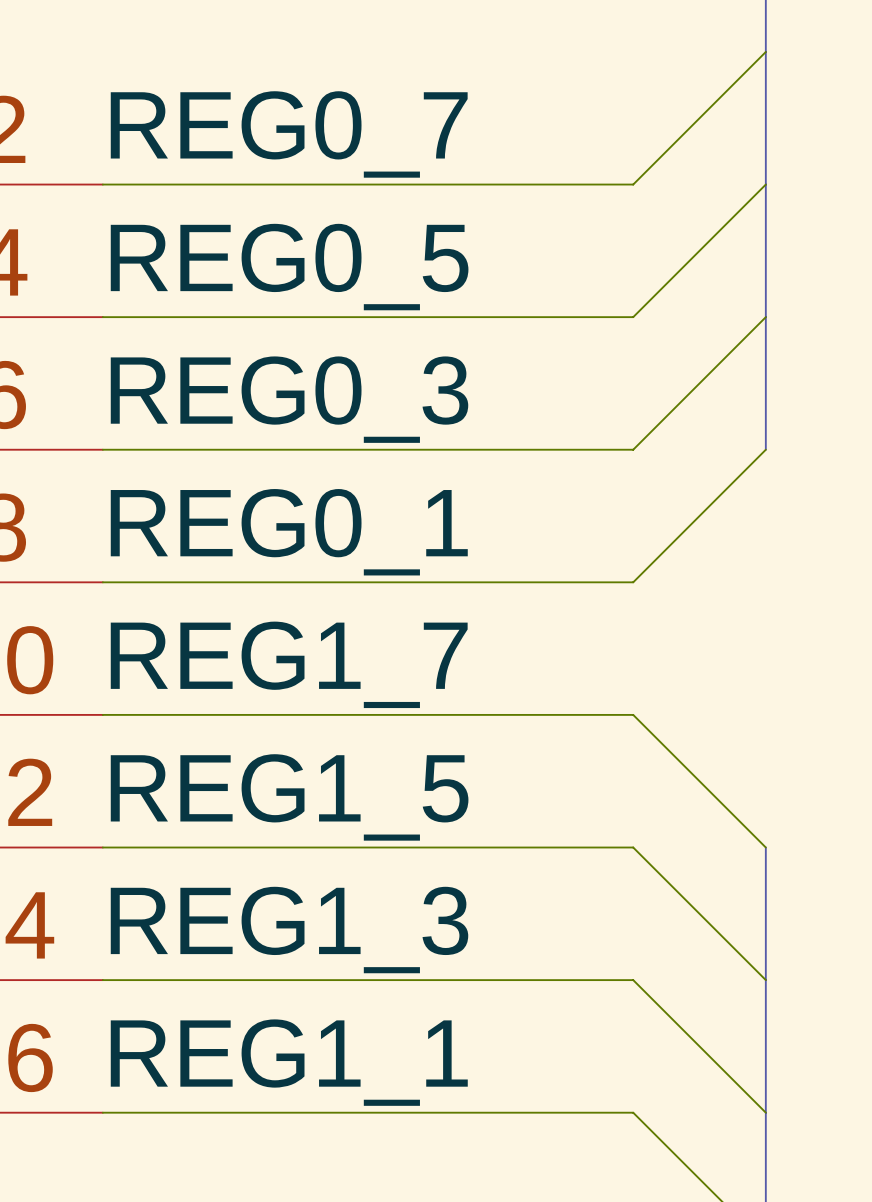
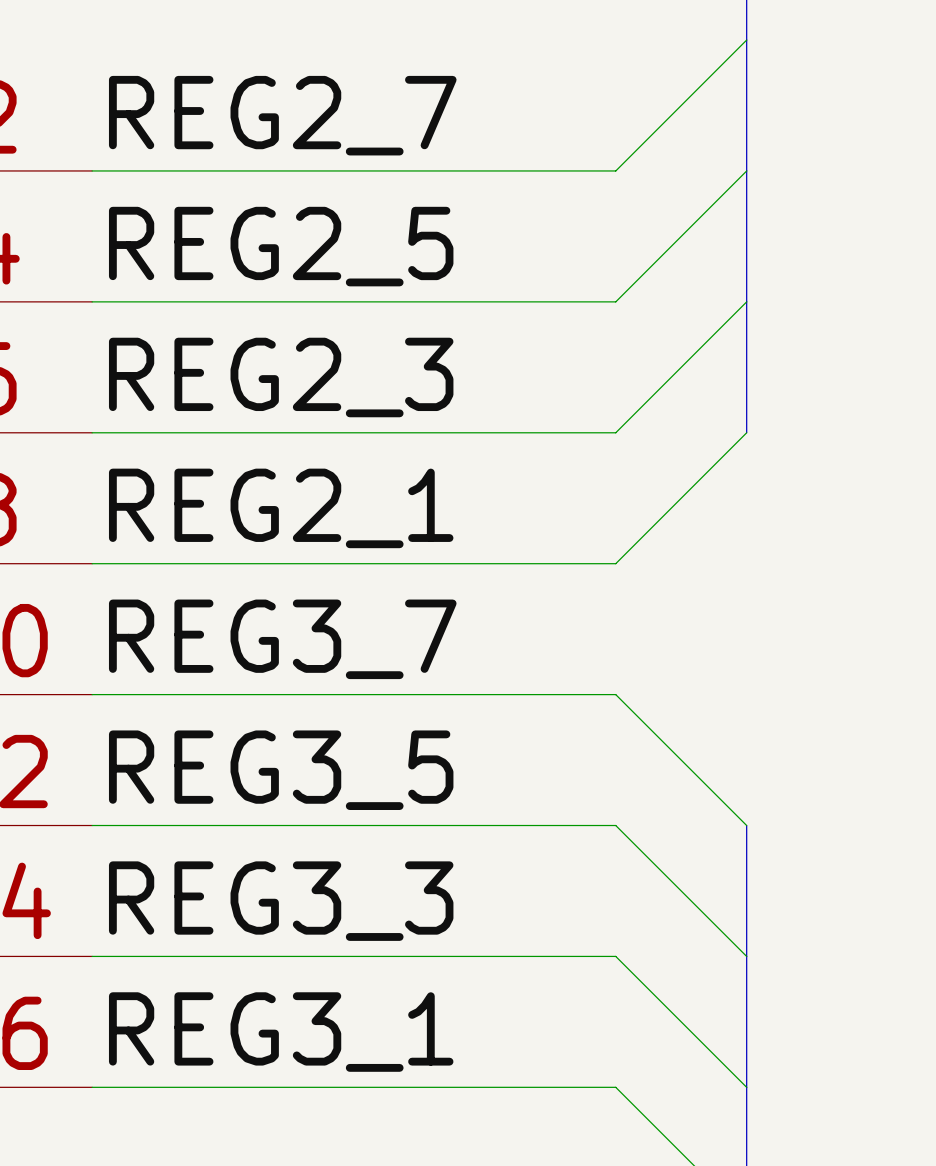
label: REG0_7 (289, 134) -> REG2_7 (282, 115)
label: REG0_5 (289, 267) -> REG2_5 (281, 246)
label: REG0_3 (289, 399) -> REG2_3 (281, 377)
label: REG0_1 (289, 532) -> REG2_1 (281, 508)
label: REG1_7 (289, 664) -> REG3_7 (282, 639)
label: REG1_5 (289, 797) -> REG3_5 (281, 770)
label: REG1_3 (289, 930) -> REG3_3 (281, 901)
label: REG1_1 (289, 1062) -> REG3_1 (281, 1032)

